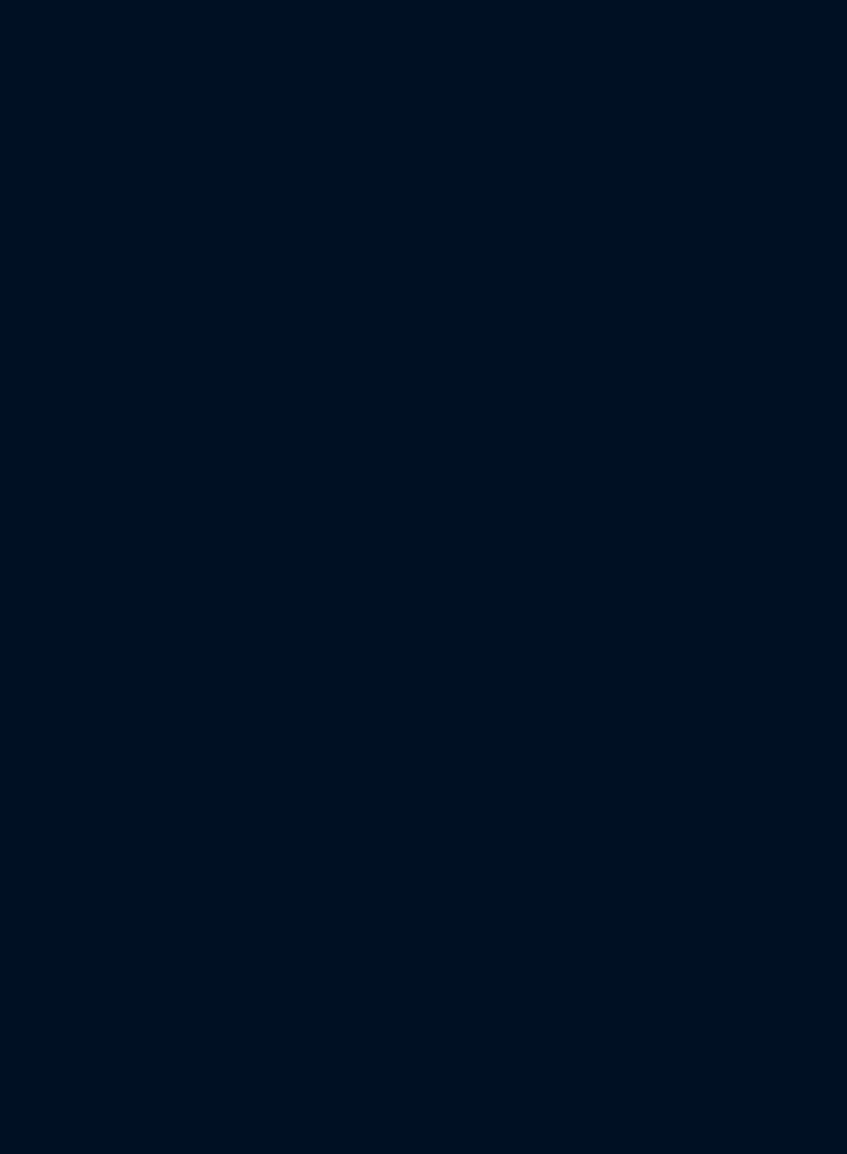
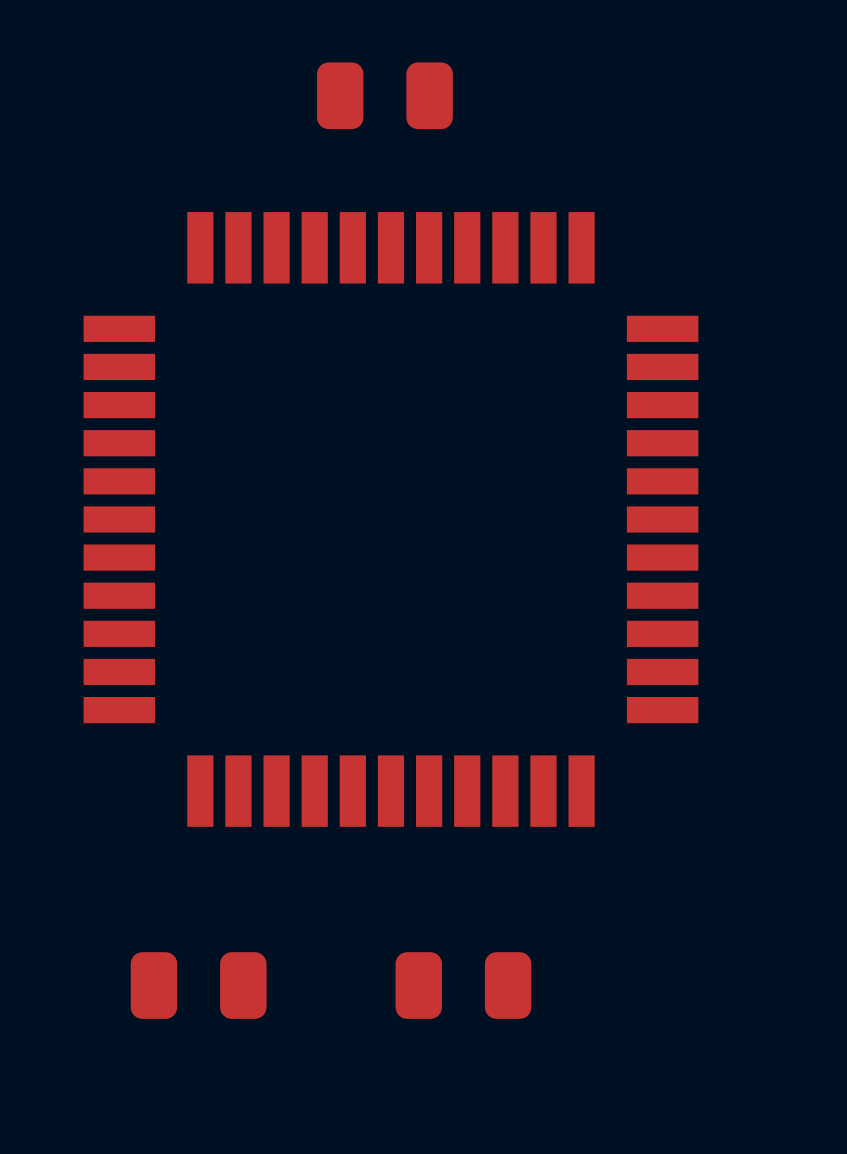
part: none -> (384, 95)
part: none -> (390, 519)
part: none -> (198, 985)
part: none -> (463, 985)

